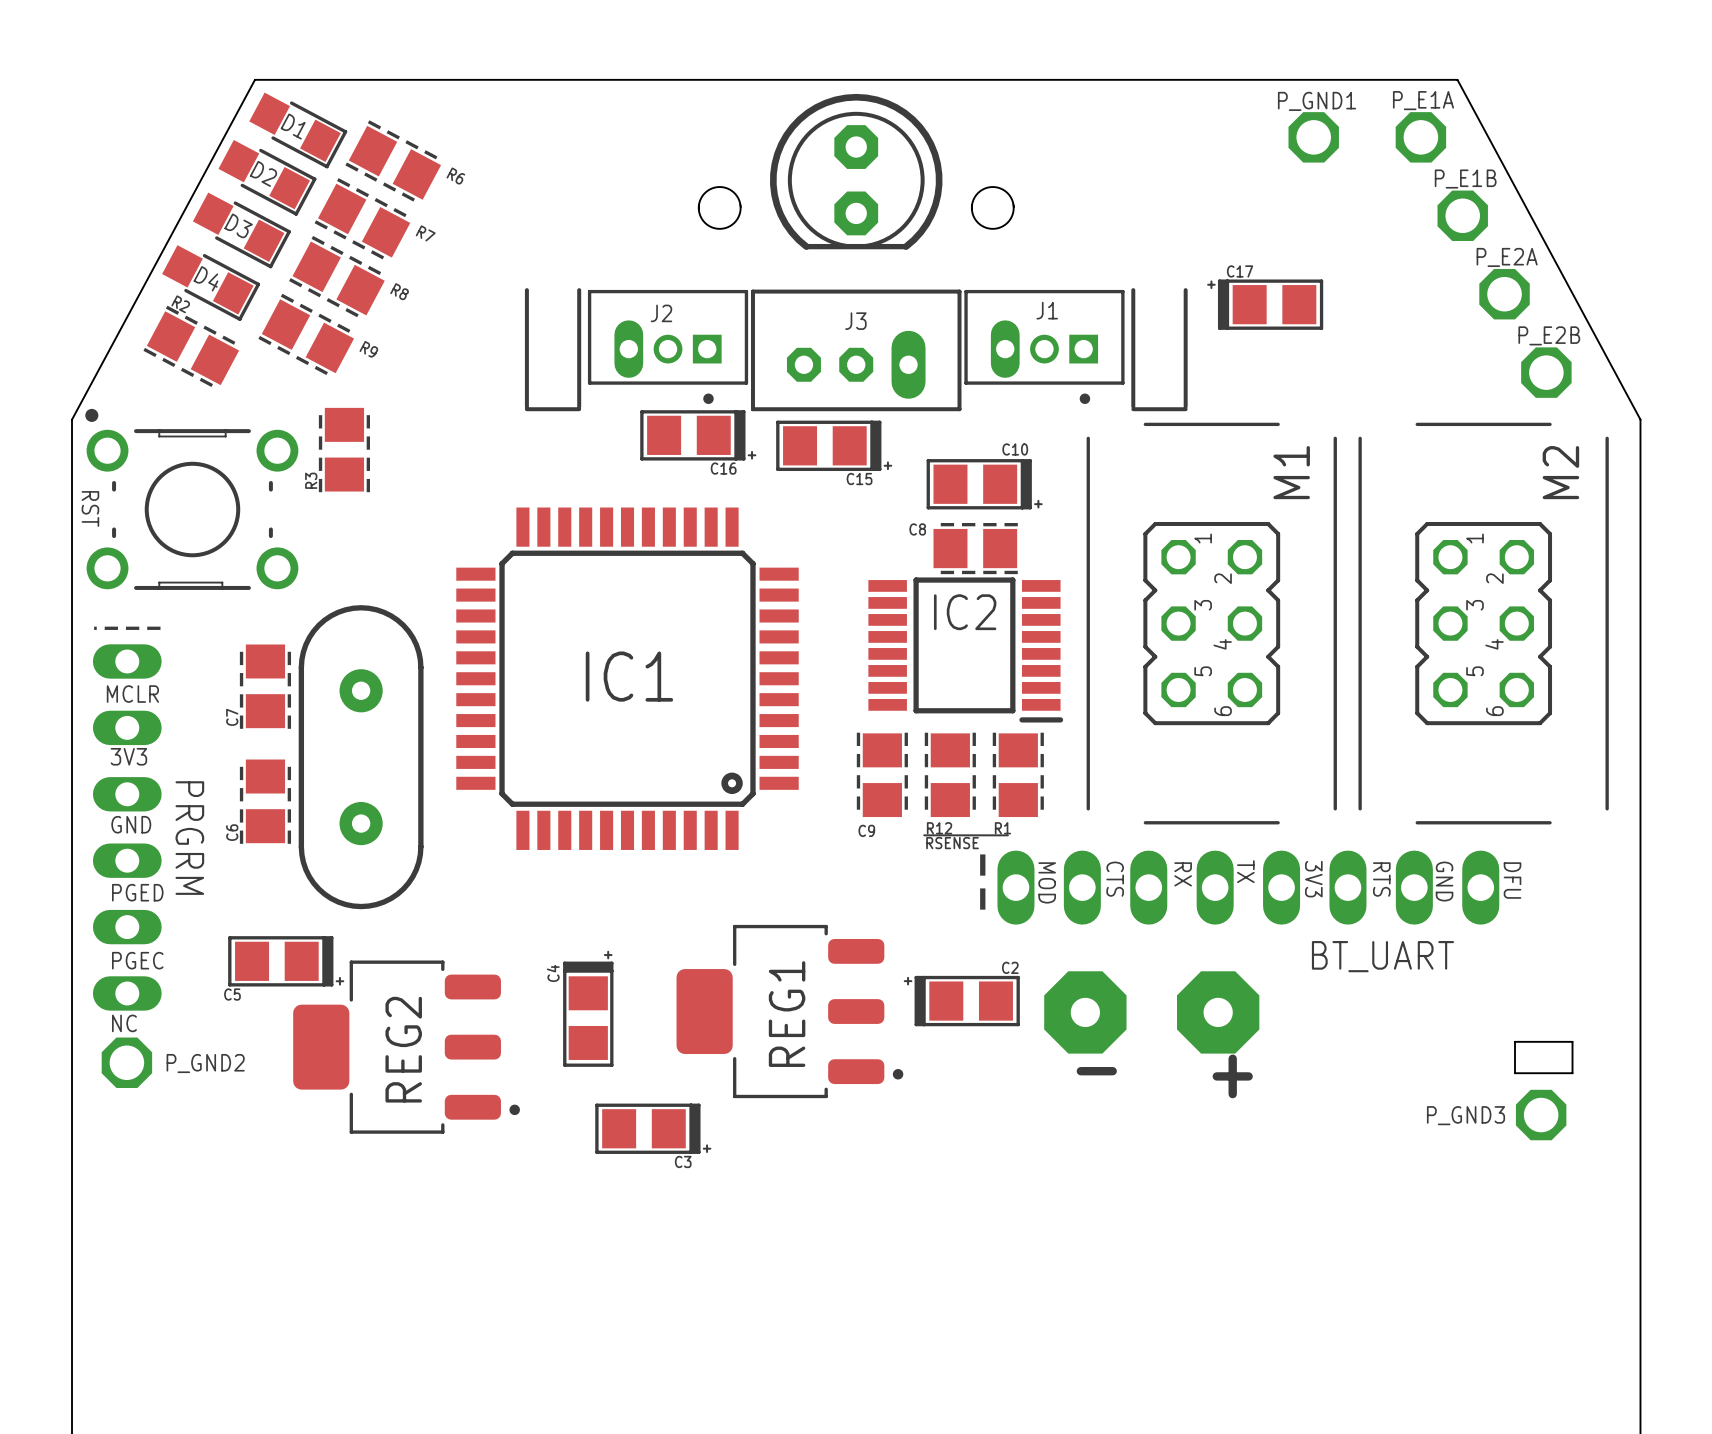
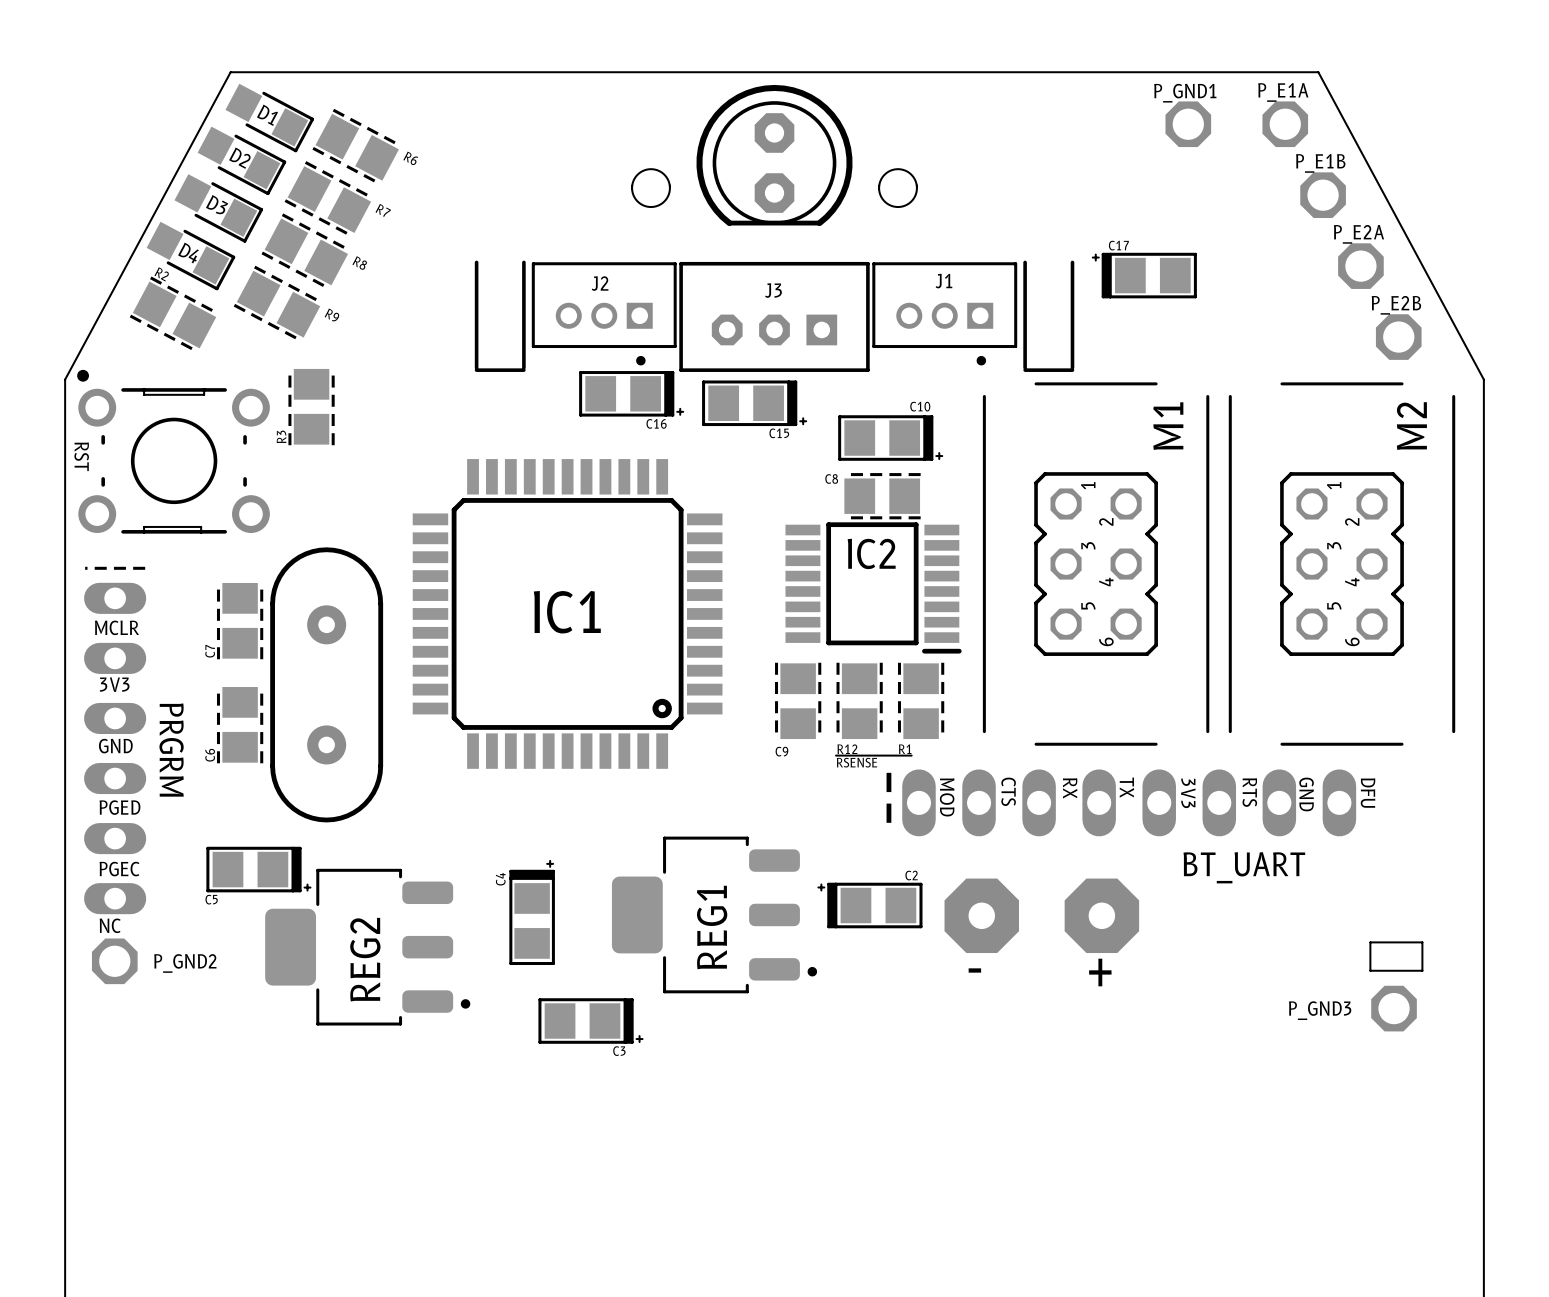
J2 footprint: [587, 289, 749, 404] -> [531, 262, 677, 366]
J3 footprint: [750, 289, 962, 412] -> [679, 261, 870, 372]
J1 footprint: [964, 289, 1125, 404] -> [872, 262, 1018, 366]

